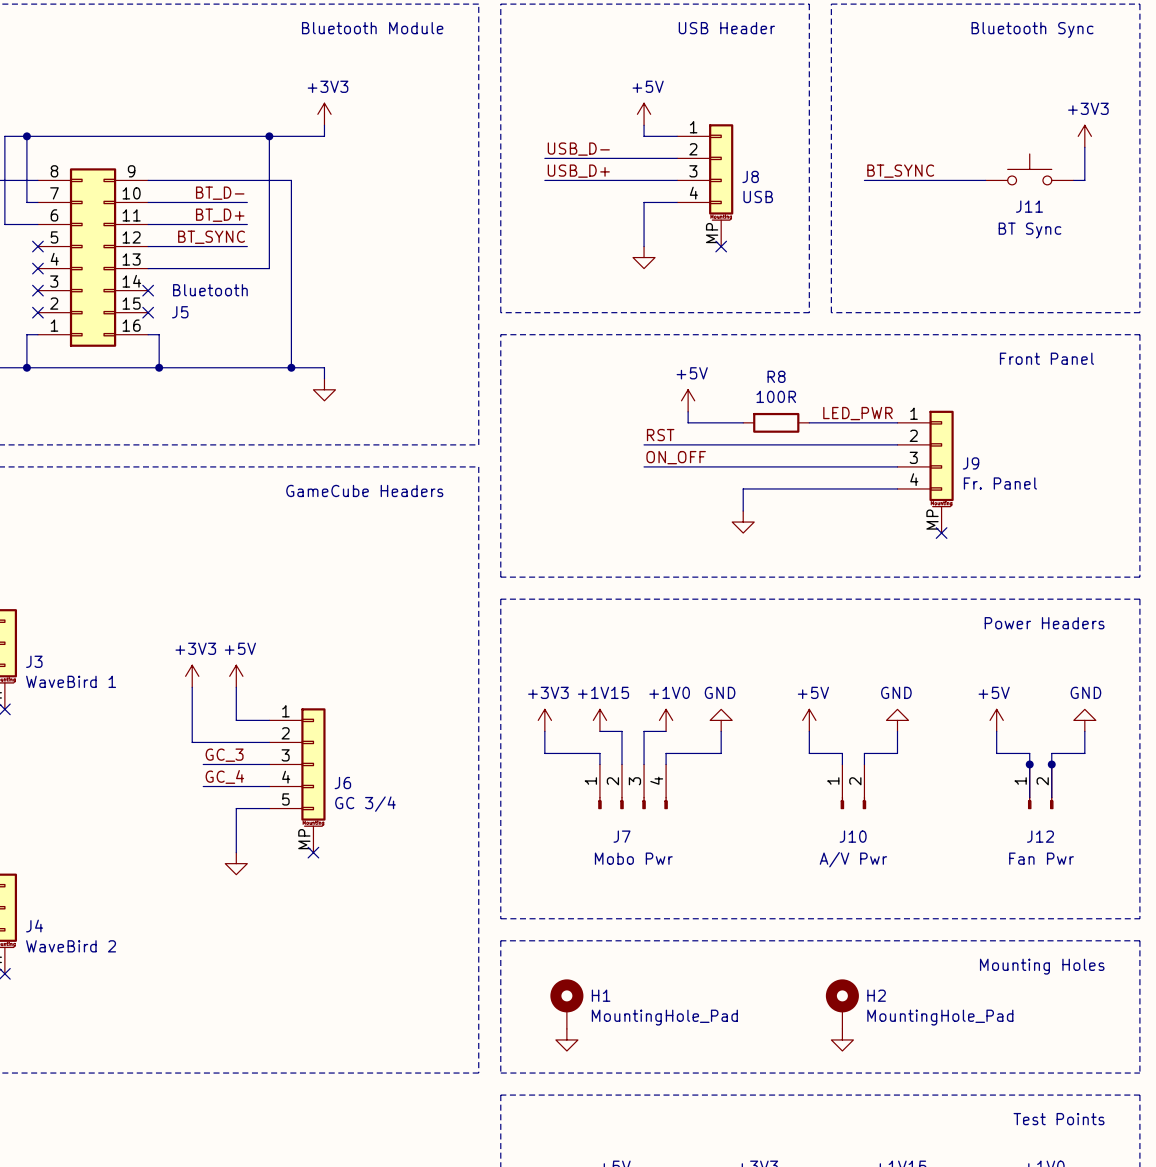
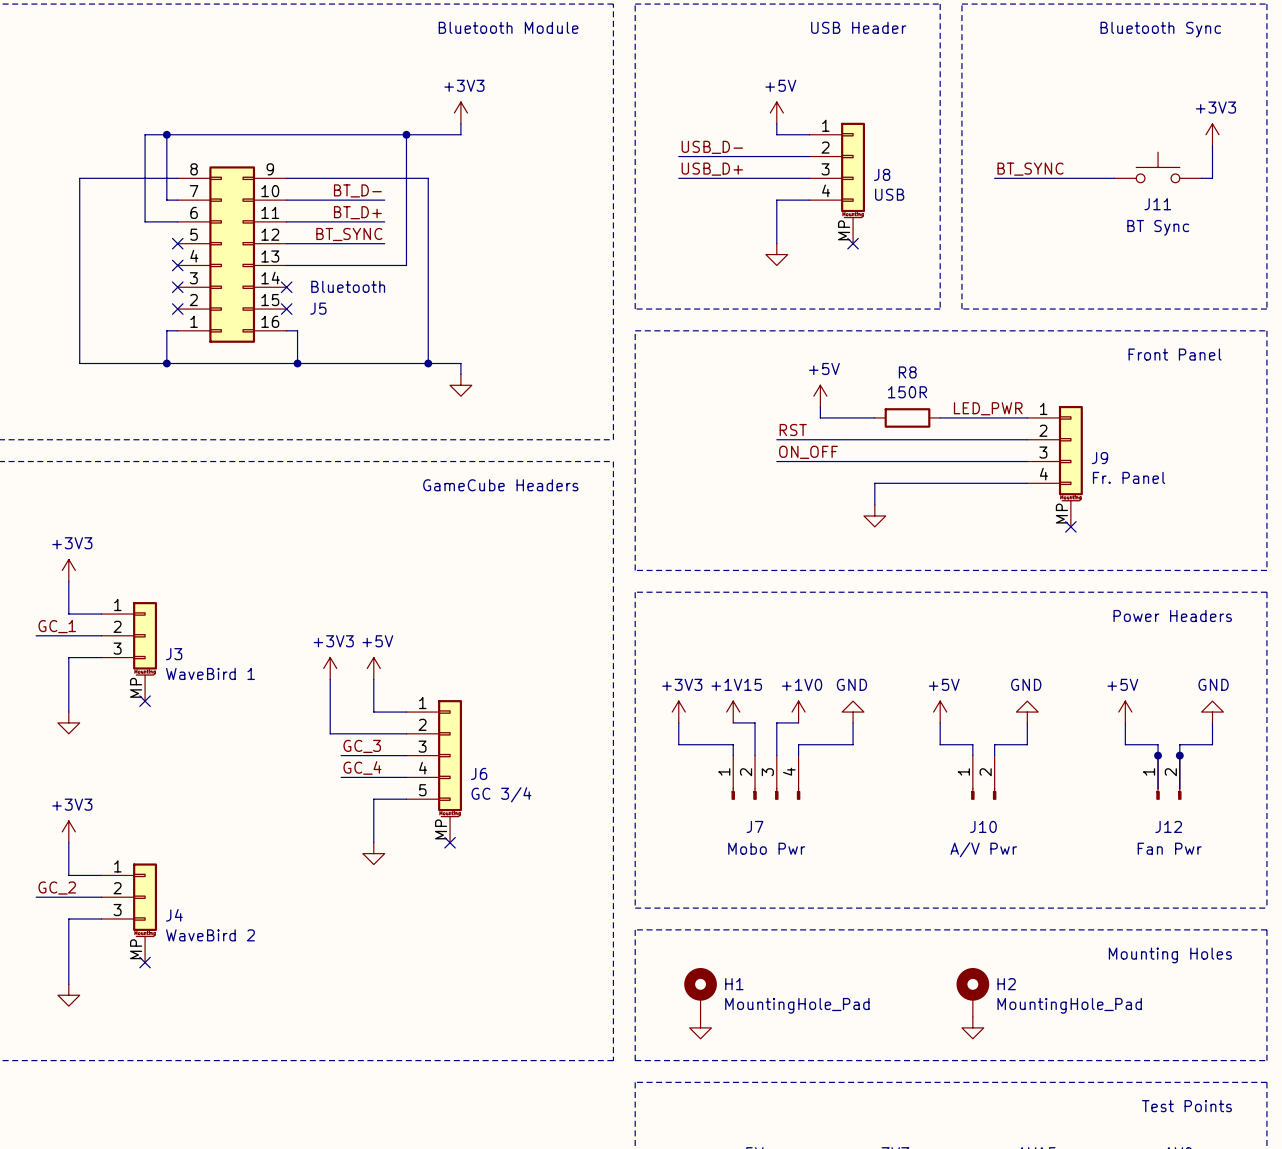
R8 value: 100R (776, 396) -> 150R (907, 392)

